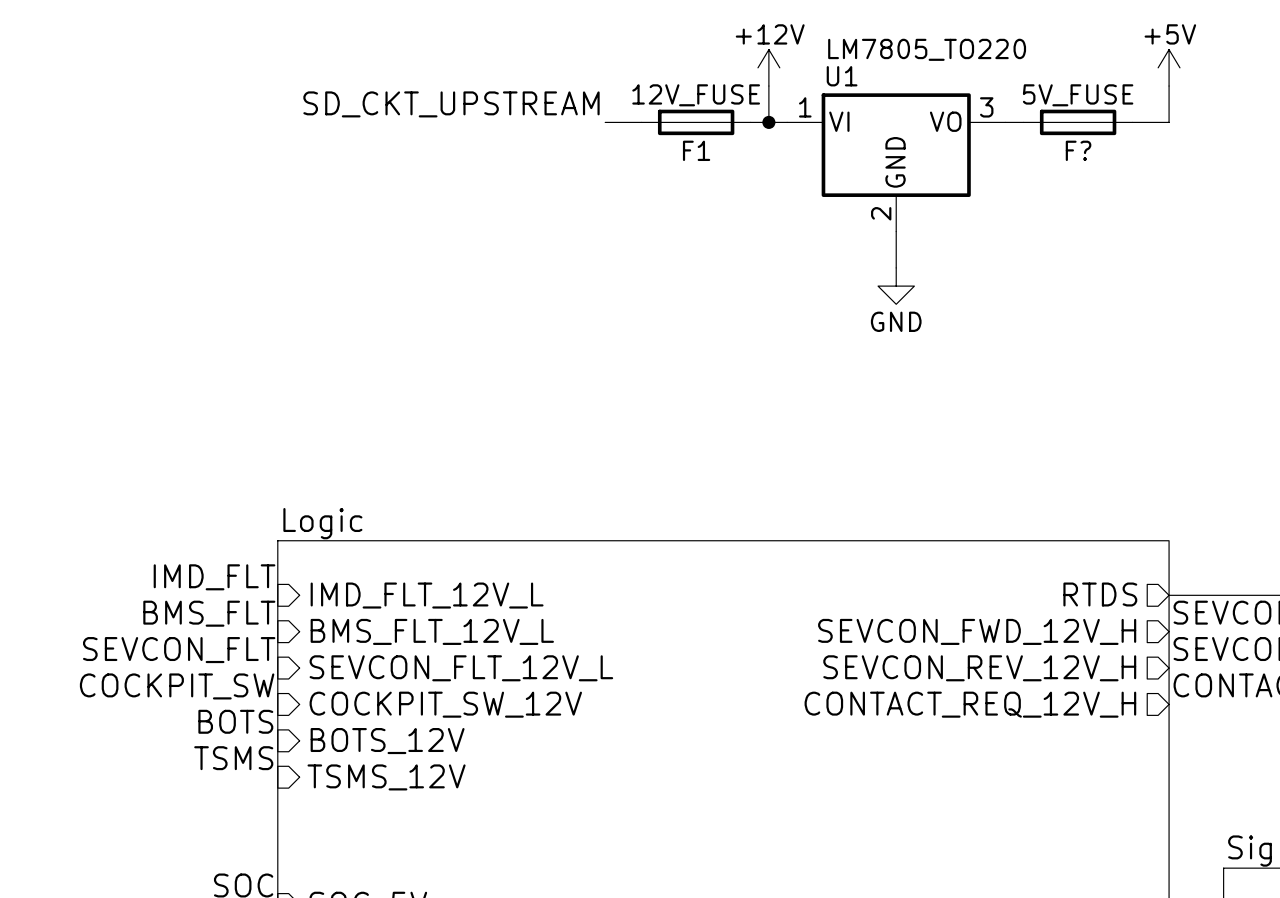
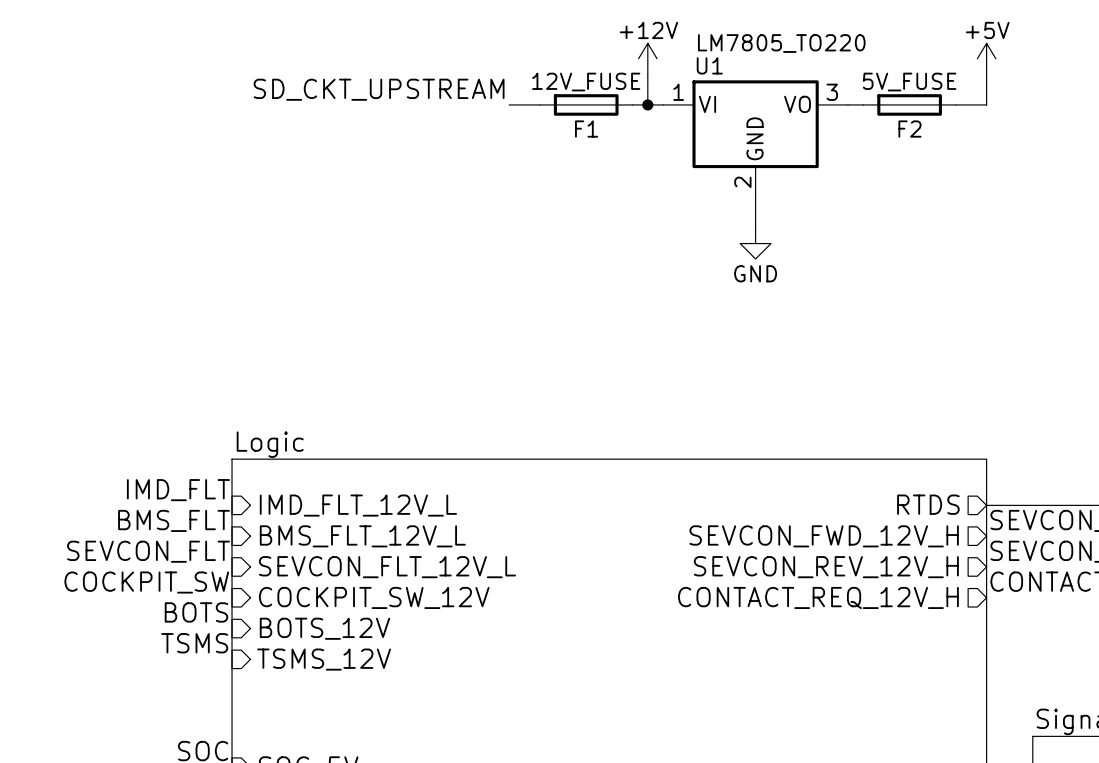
F? name: F? (1078, 150) -> F2 (909, 129)

